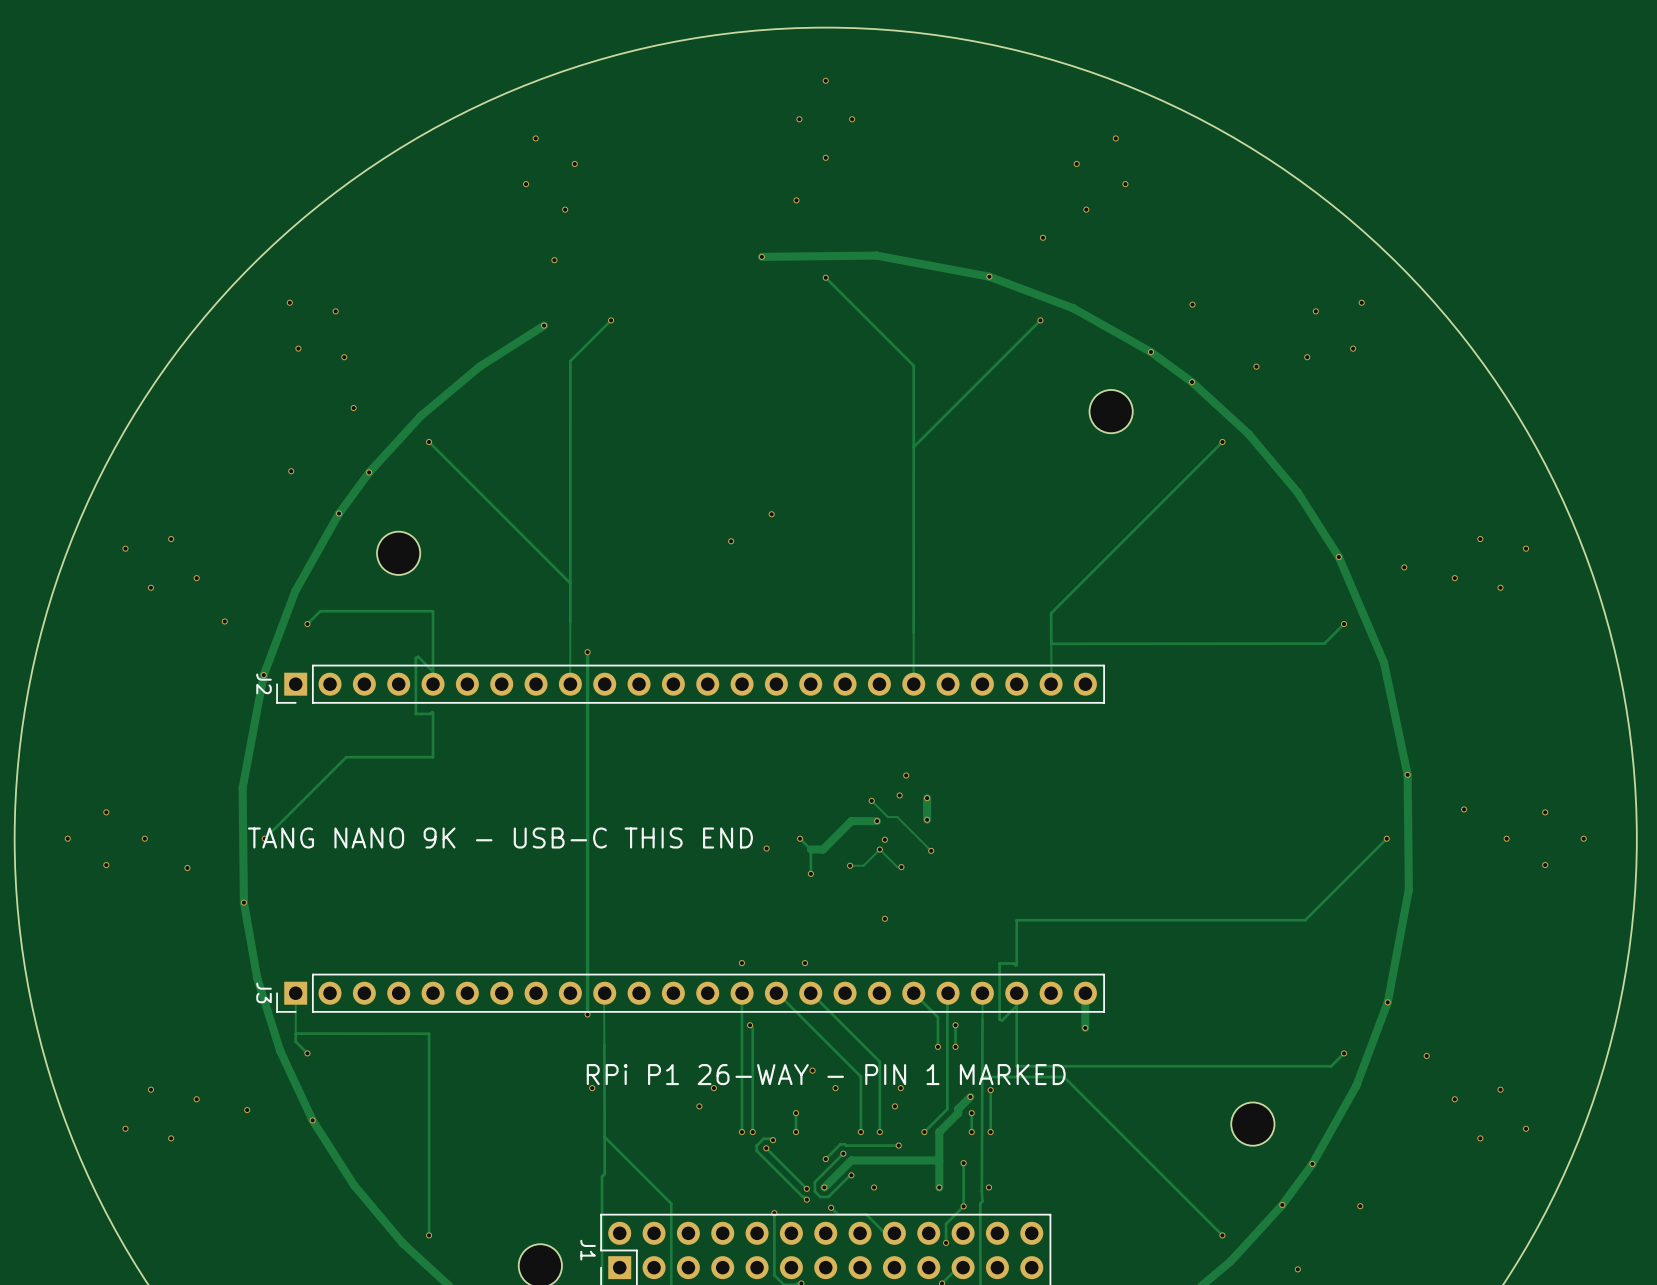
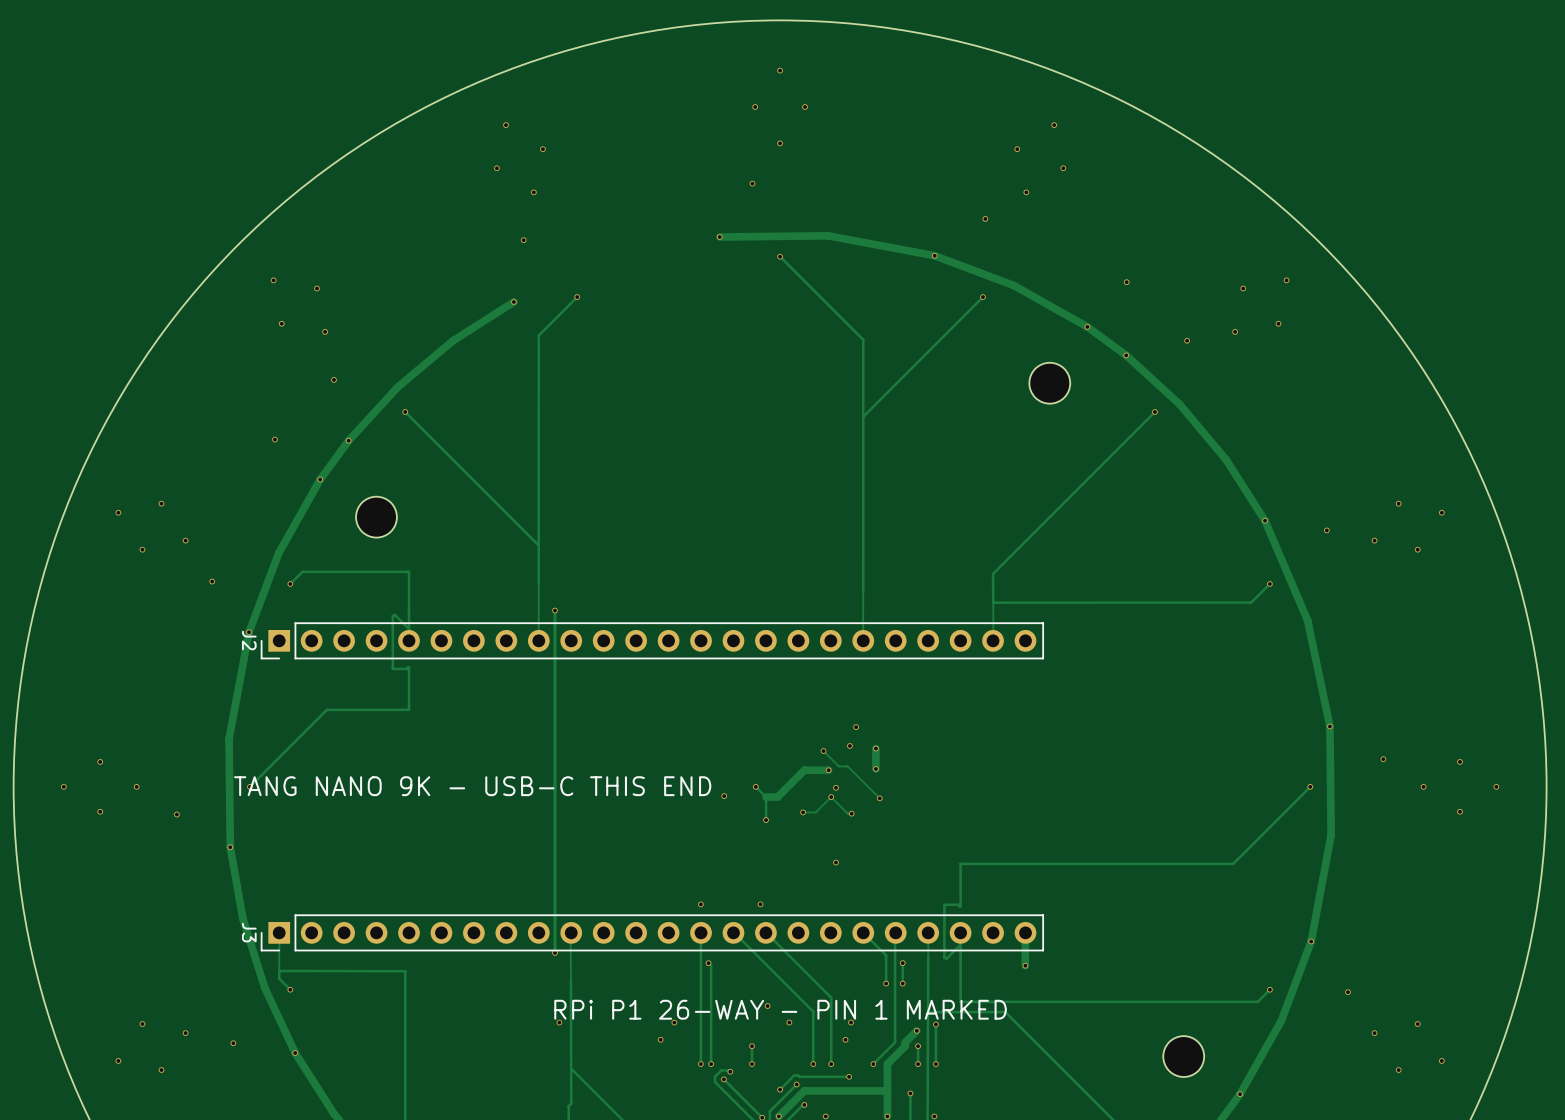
via: (771, 514) -> none
via: (731, 541) -> none

